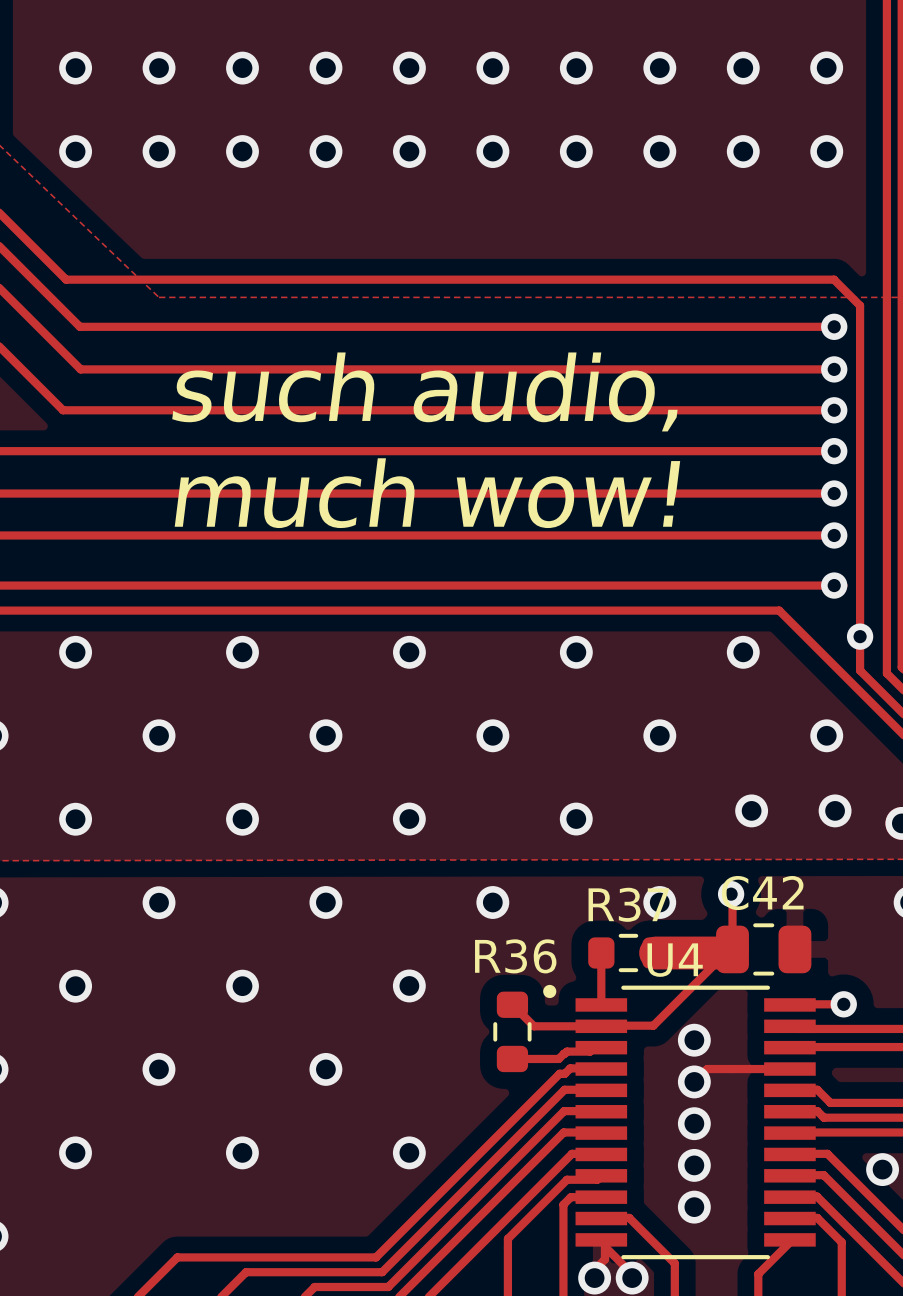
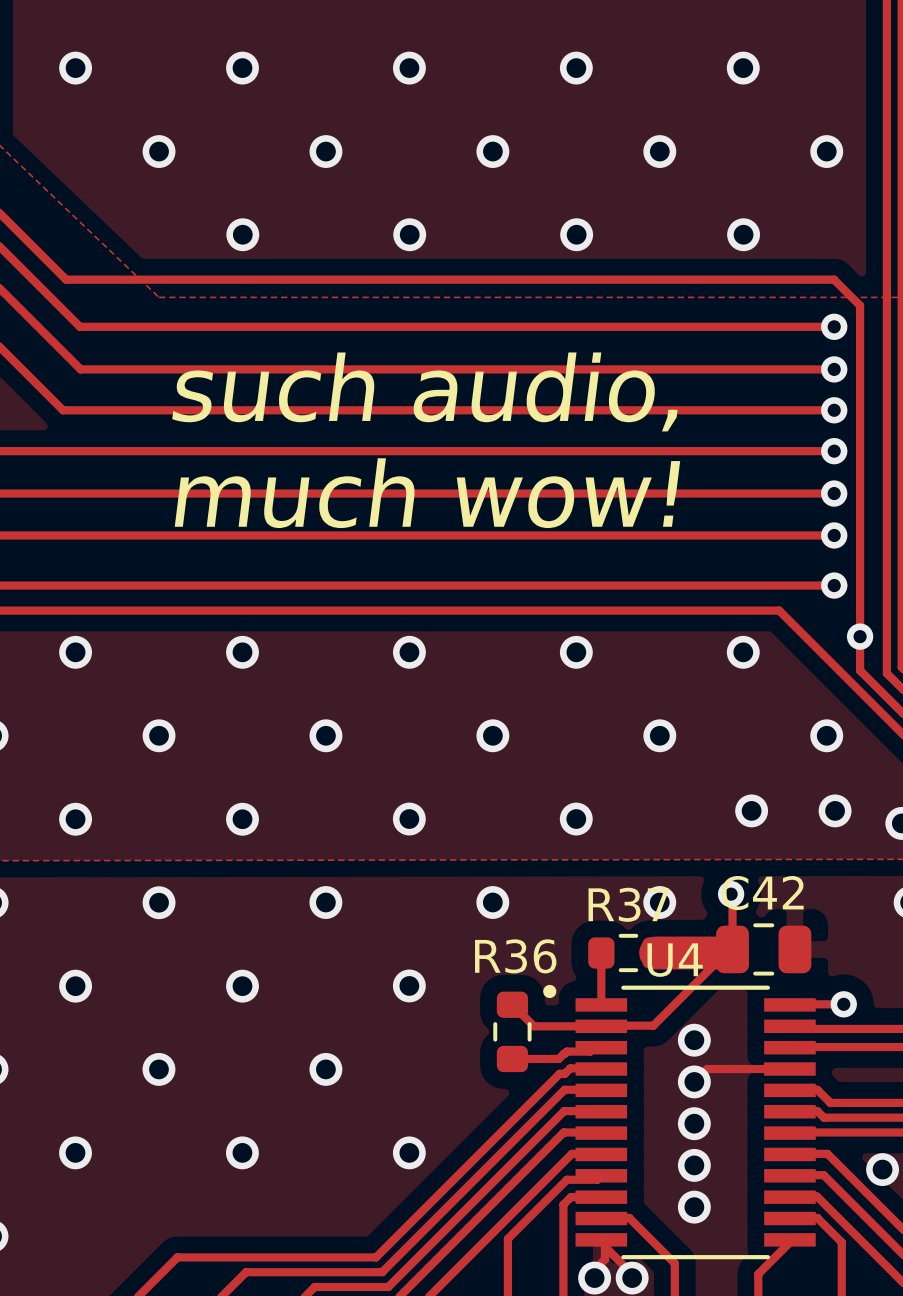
via: (826, 67) -> none
via: (159, 68) -> none
via: (325, 68) -> none
via: (492, 68) -> none
via: (659, 68) -> none
via: (75, 151) -> none
via position: (242, 151) -> (242, 234)
via position: (409, 151) -> (409, 234)
via position: (576, 151) -> (576, 234)
via position: (743, 151) -> (743, 234)

